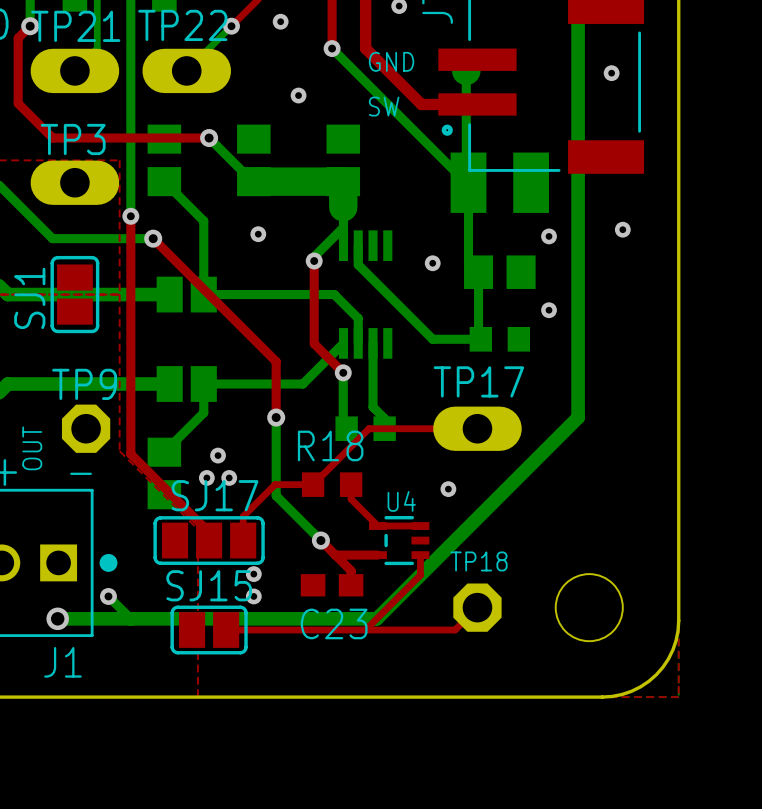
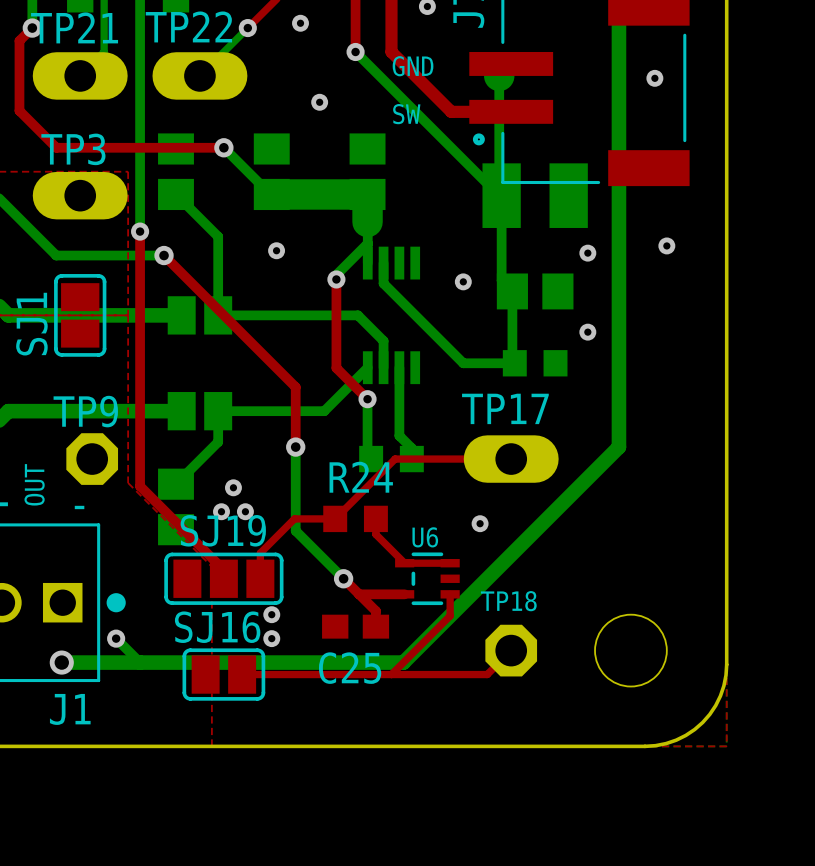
R18 name: R18 (330, 445) -> R24 (361, 477)
SJ17 name: SJ17 (215, 495) -> SJ19 (223, 530)
U4 name: U4 (401, 501) -> U6 (425, 537)
SJ15 name: SJ15 (209, 585) -> SJ16 (217, 627)
C23 name: C23 (334, 623) -> C25 (350, 668)

